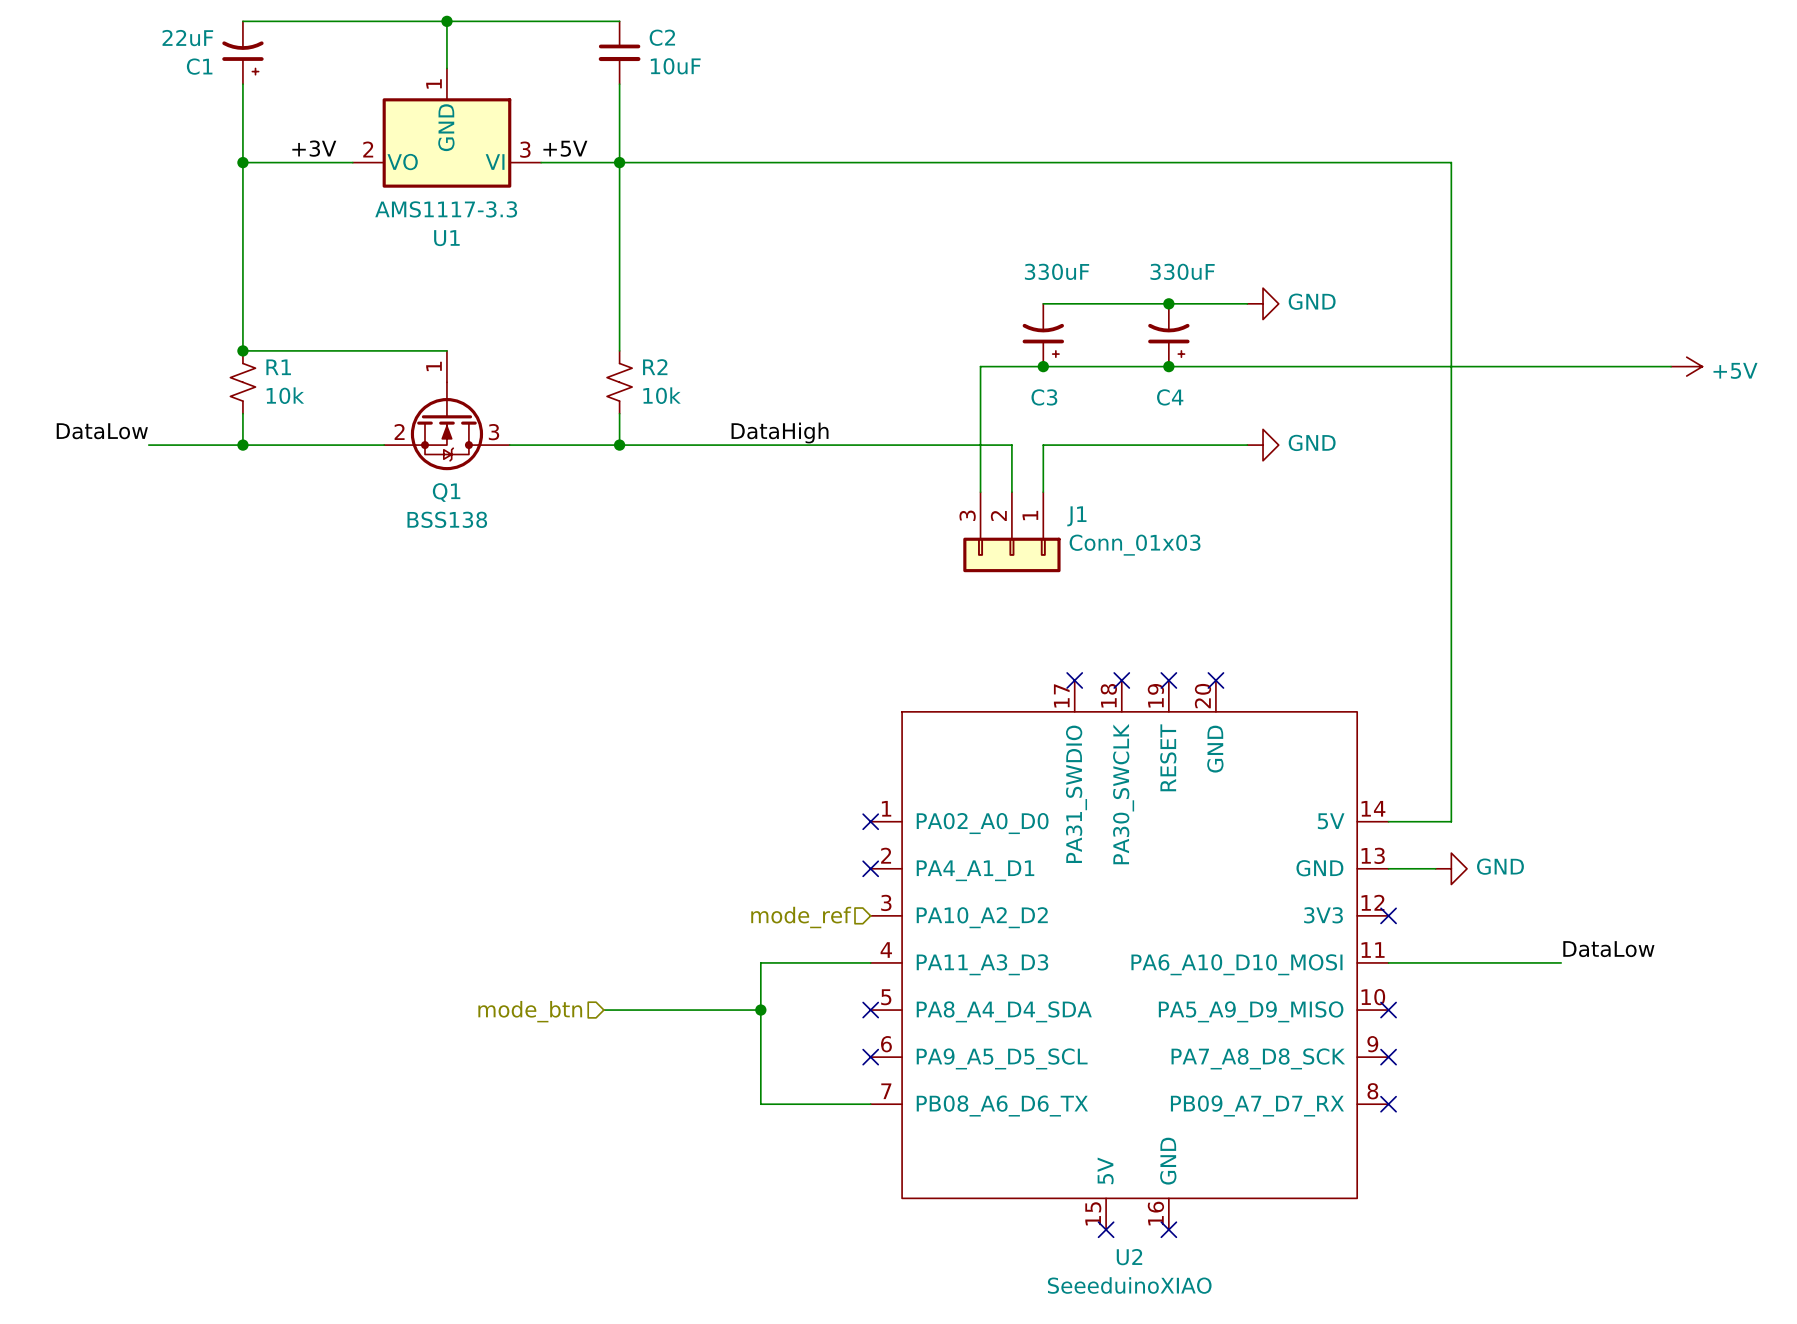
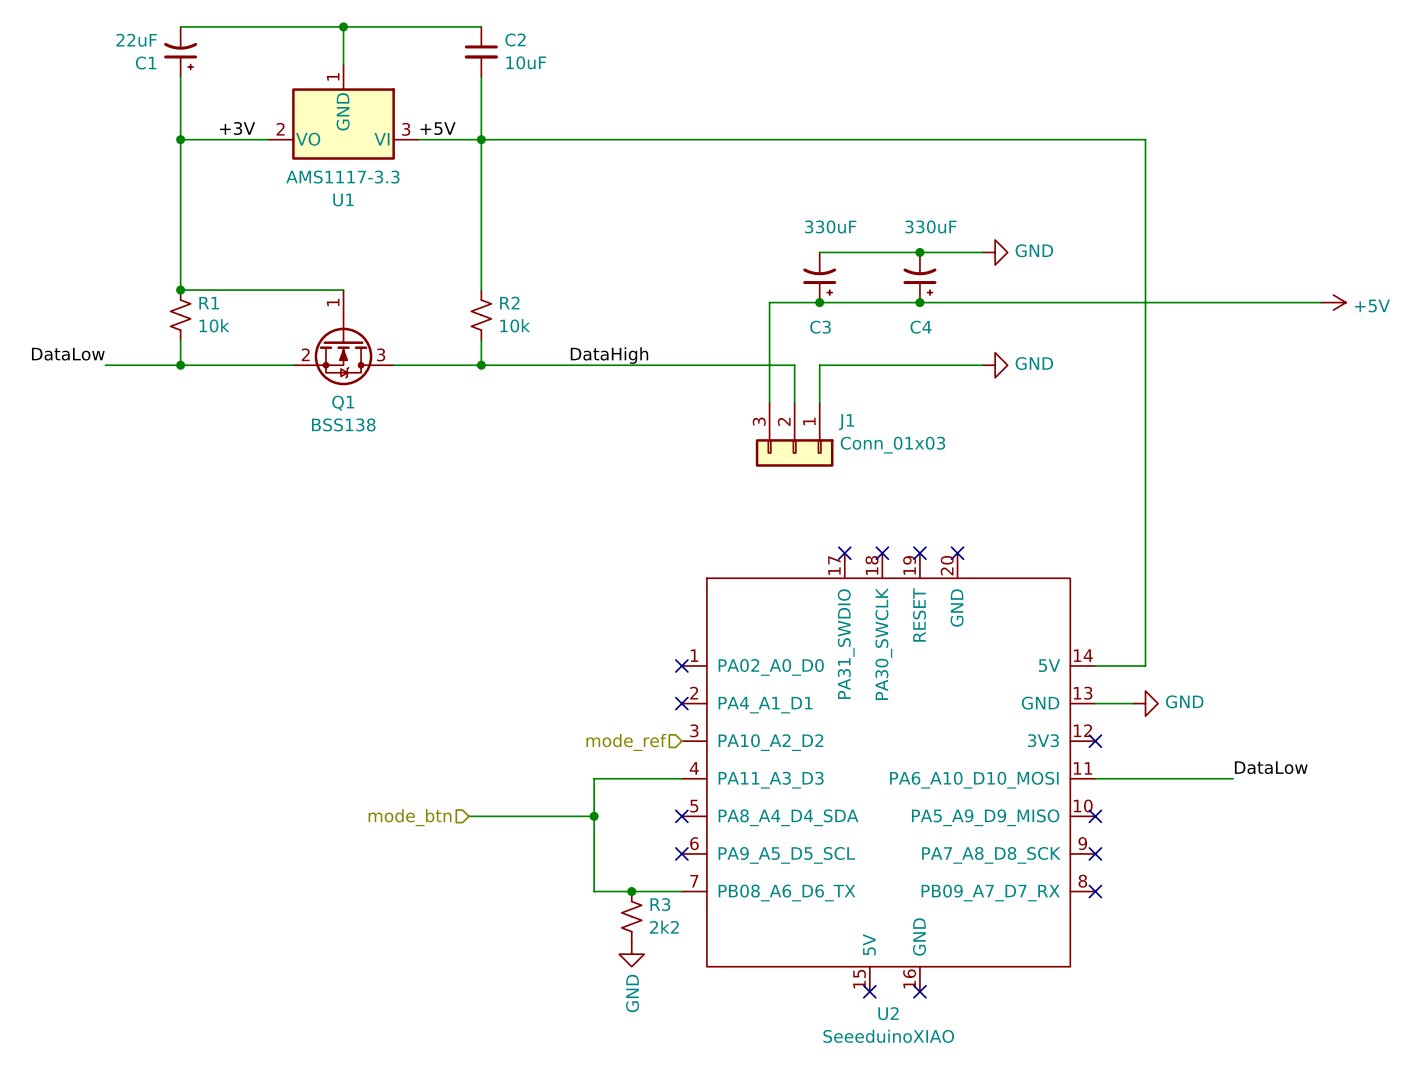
junction: none -> (631, 891)
R3: none -> 2k2 (631, 916)
power symbol: none -> GND (631, 954)

